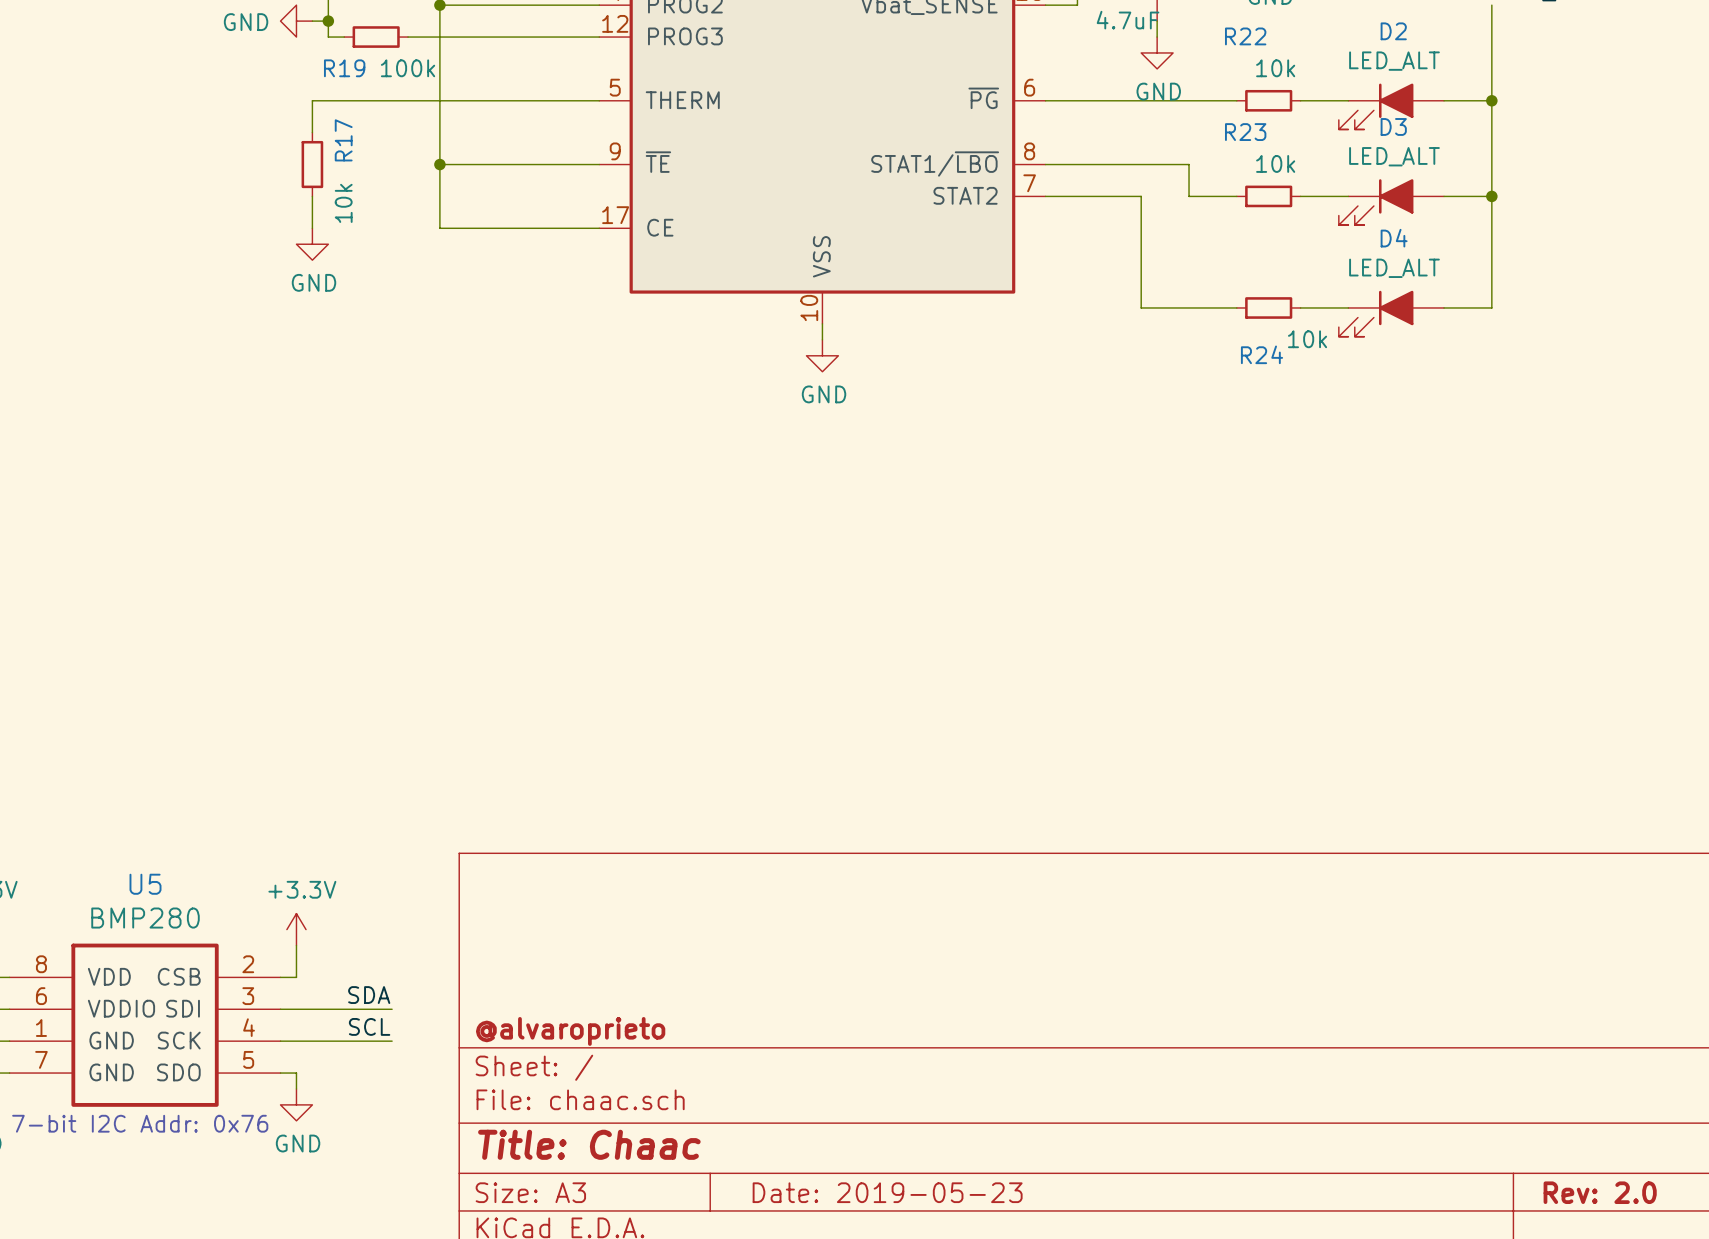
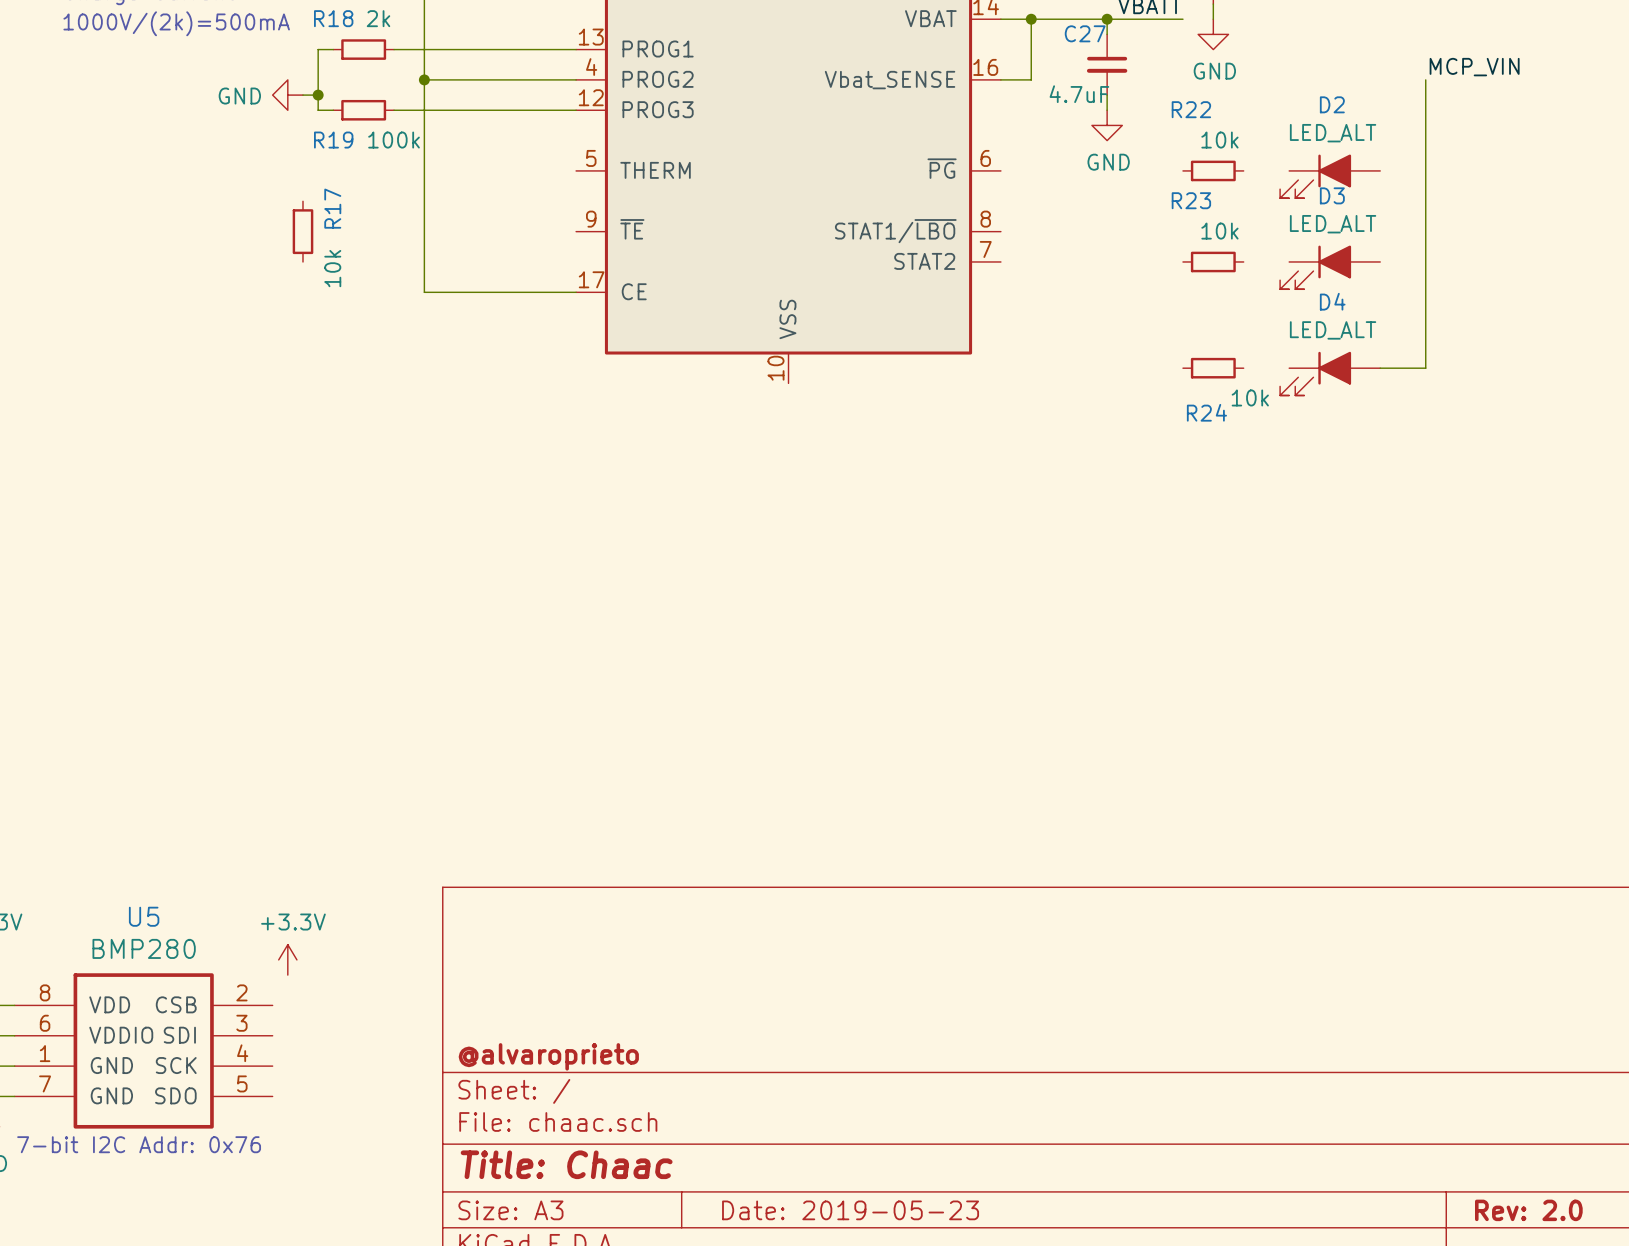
wire: (599, 100) (312, 100) (312, 132) -> none
wire: (1045, 100) (1236, 100) -> none
wire: (1300, 100) (1348, 100) -> none
wire: (1444, 100) (1491, 100) -> none
junction: (1491, 100) -> none
wire: (439, 164) (599, 164) -> none
junction: (439, 164) -> none
wire: (1045, 164) (1189, 164) (1189, 196) (1236, 196) -> none
wire: (312, 196) (312, 228) -> none
wire: (1045, 196) (1141, 196) (1141, 307) (1236, 307) -> none
wire: (1300, 196) (1348, 196) -> none
wire: (1444, 196) (1491, 196) -> none
junction: (1491, 196) -> none
power symbol: GND (312, 244) -> none
wire: (1300, 307) (1348, 307) -> none
wire: (822, 323) (822, 339) -> none
power symbol: GND (822, 355) -> none
wire: (296, 945) (296, 977) (280, 977) -> none
label: SDA (369, 995) -> none
wire: (280, 1009) (392, 1009) -> none
label: SCL (369, 1026) -> none
wire: (280, 1041) (392, 1041) -> none
wire: (280, 1073) (296, 1073) (296, 1088) -> none
power symbol: GND (296, 1104) -> none

